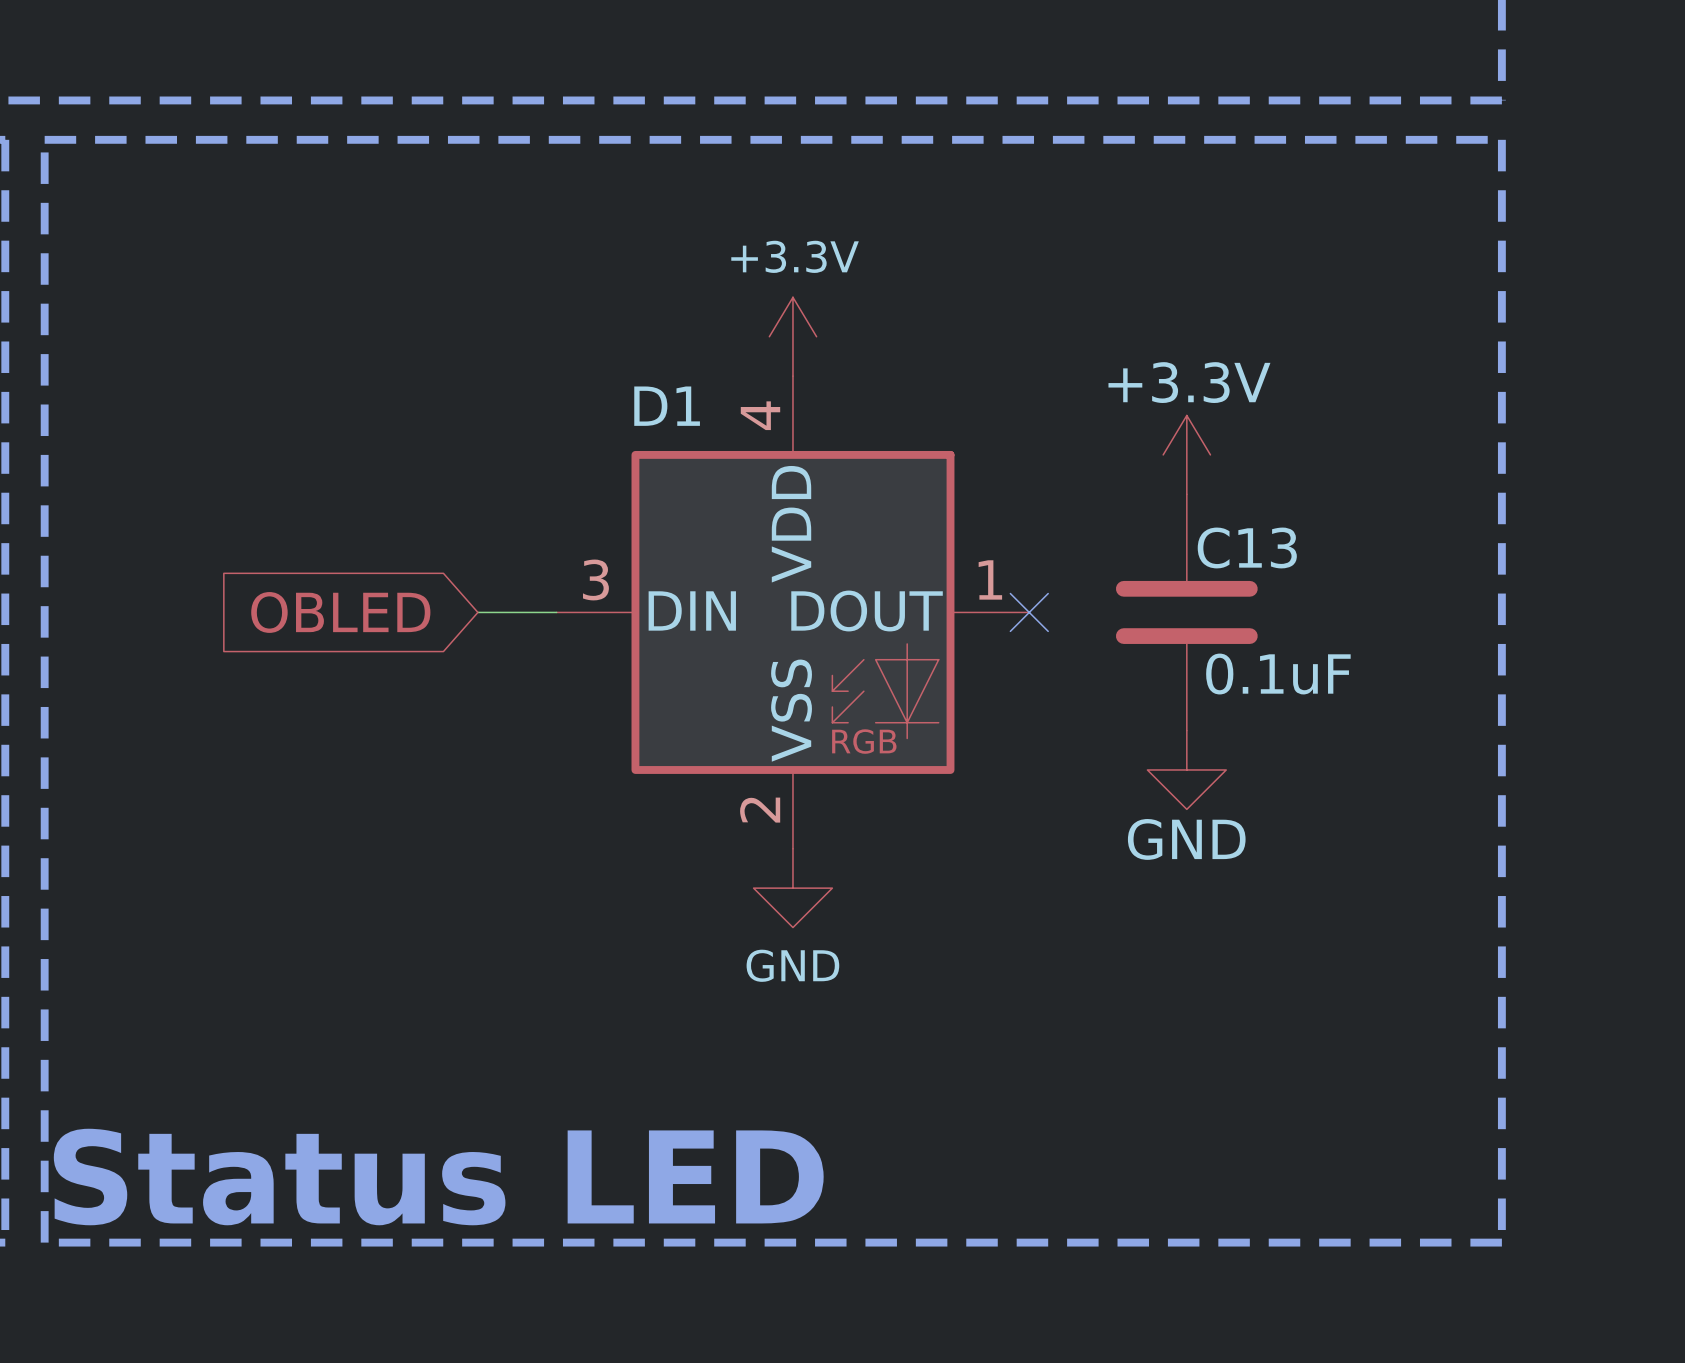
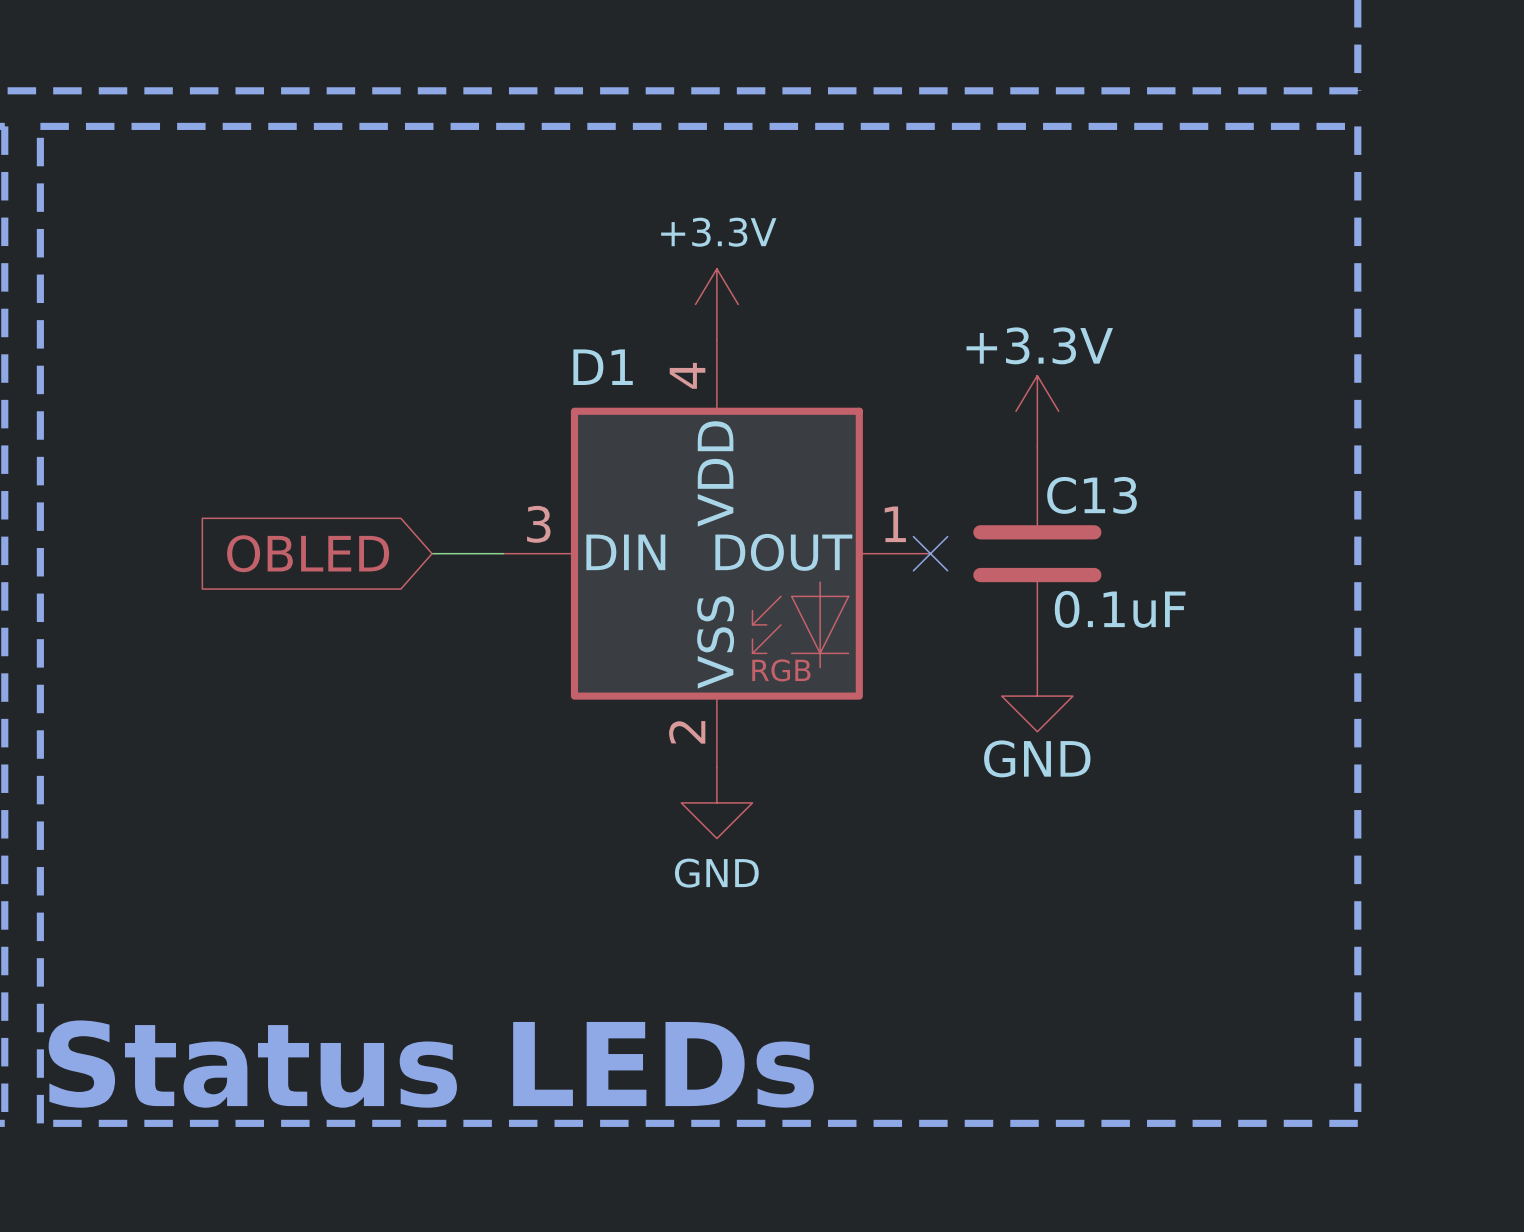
power symbol position: +3.3V (1186, 454) -> +3.3V (1037, 411)
C13 position: (1186, 612) -> (1037, 553)
power symbol position: GND (1186, 769) -> GND (1037, 696)
text: Status LED (438, 1177) -> Status LEDs (431, 1064)

